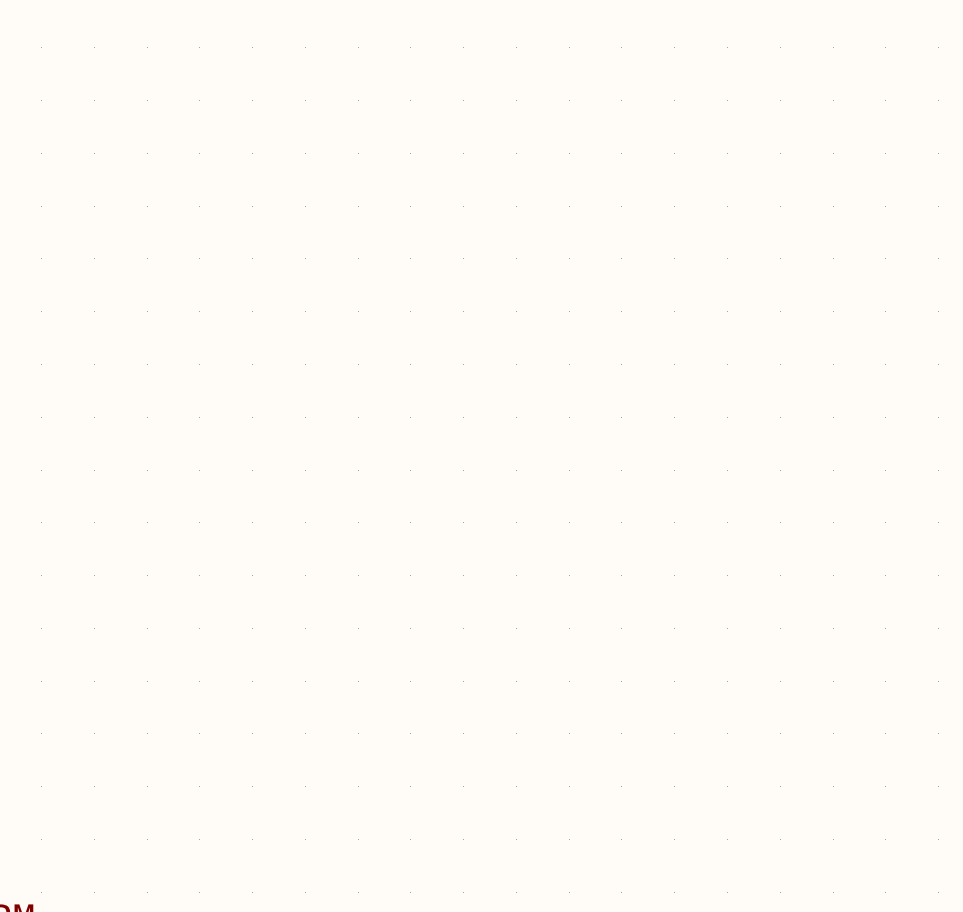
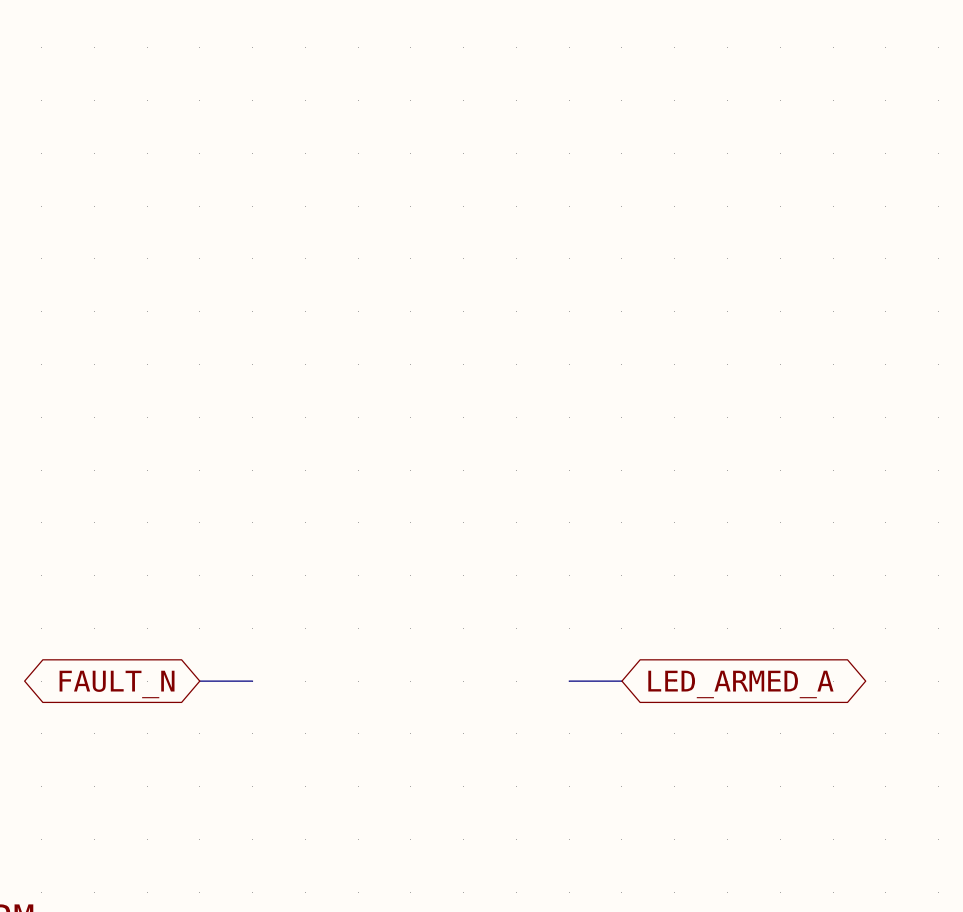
wire: none -> (199, 681) (252, 681)
wire: none -> (569, 681) (621, 681)
global label: none -> FAULT_N (117, 684)
global label: none -> LED_ARMED_A (740, 684)

